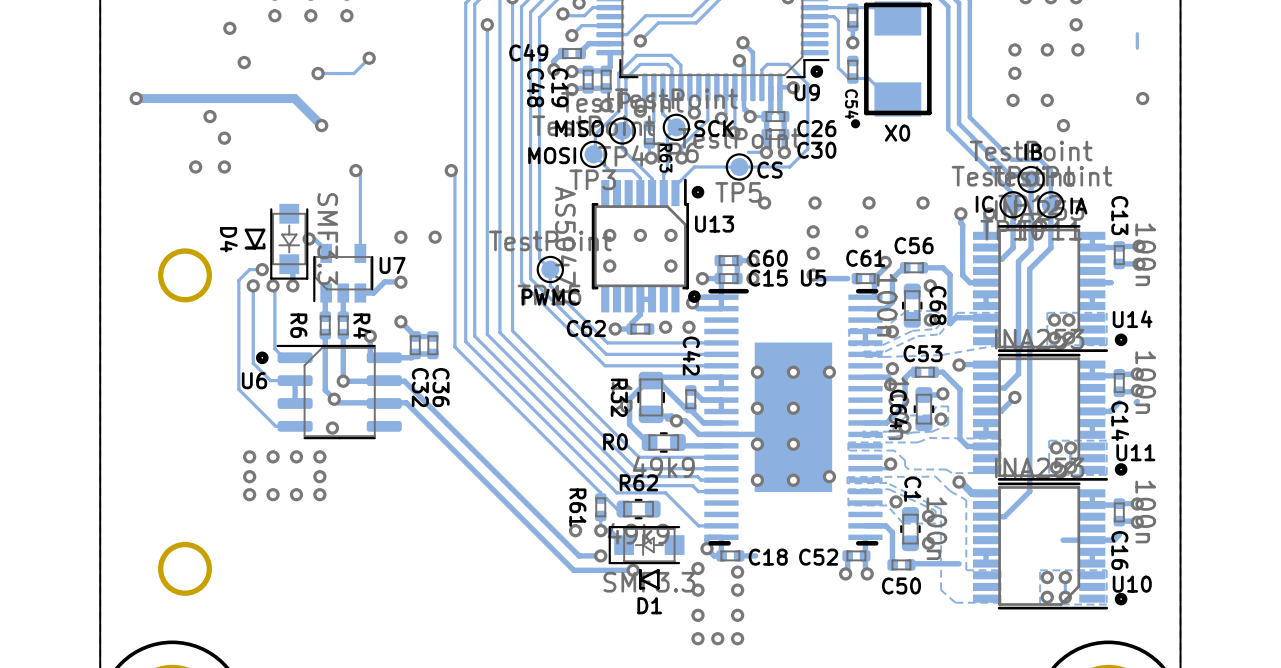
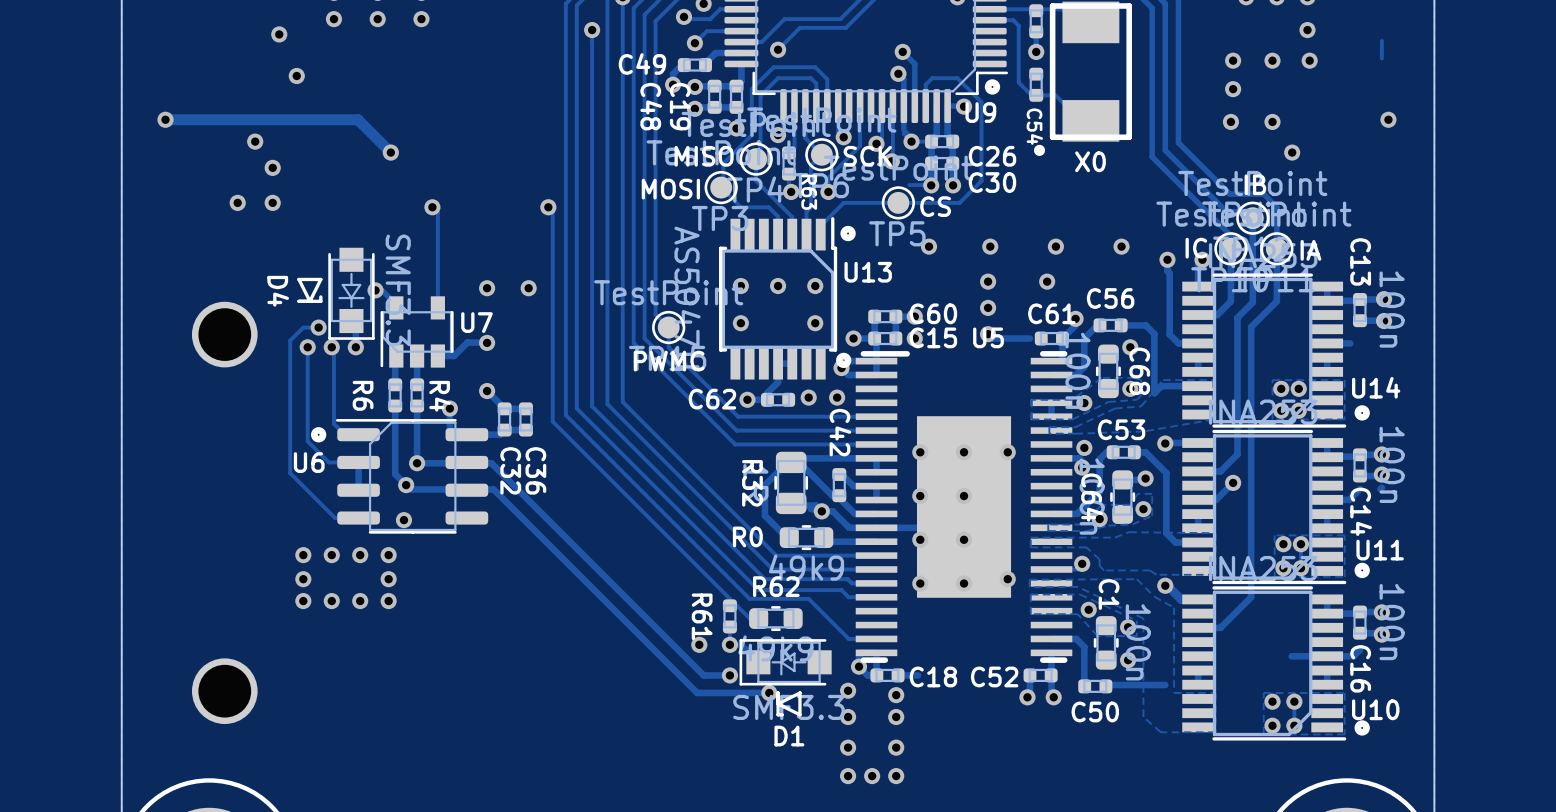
track: (369, 58) (353, 73) (318, 73) -> none
via: (369, 58) -> none
via: (318, 73) -> none

